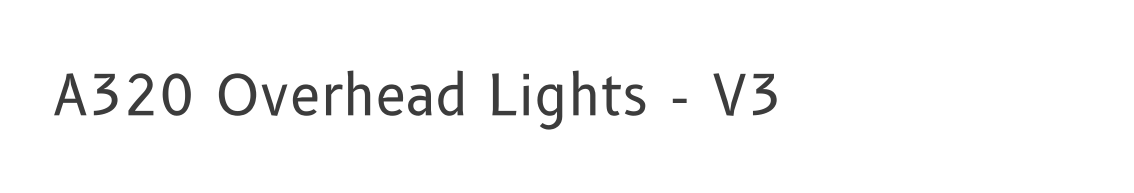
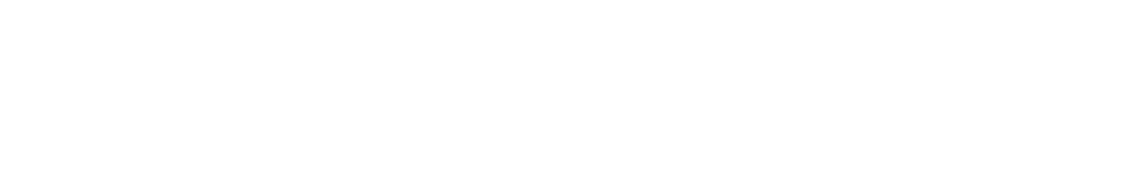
text: A320 Overhead Lights - V3 (415, 100) -> none

